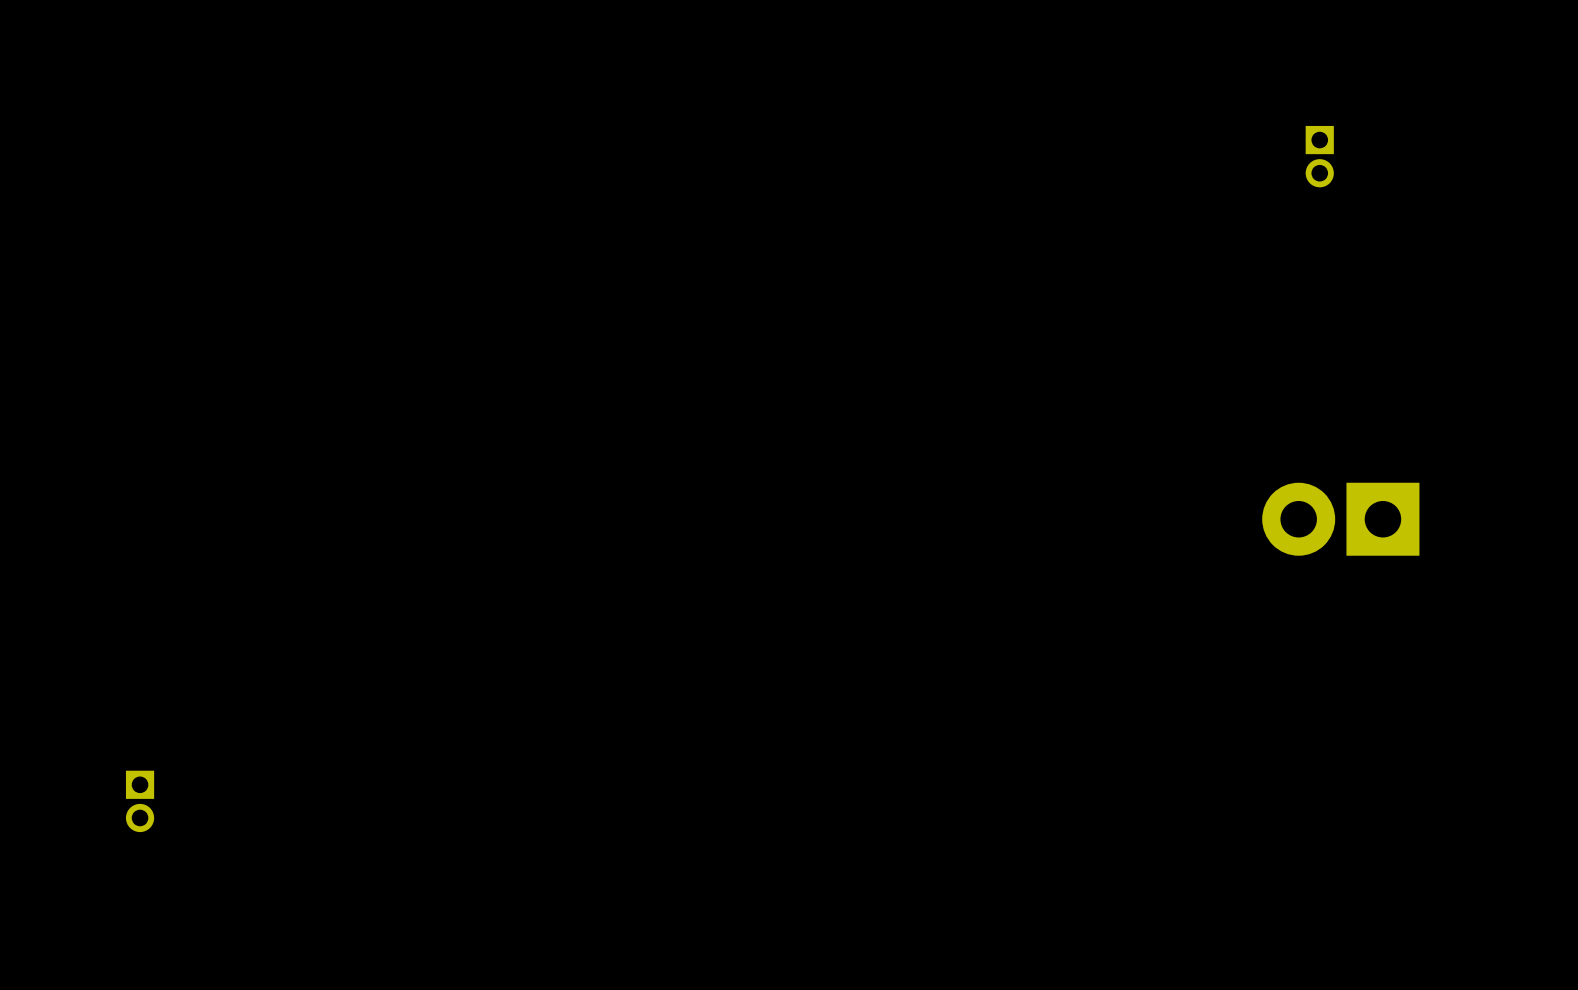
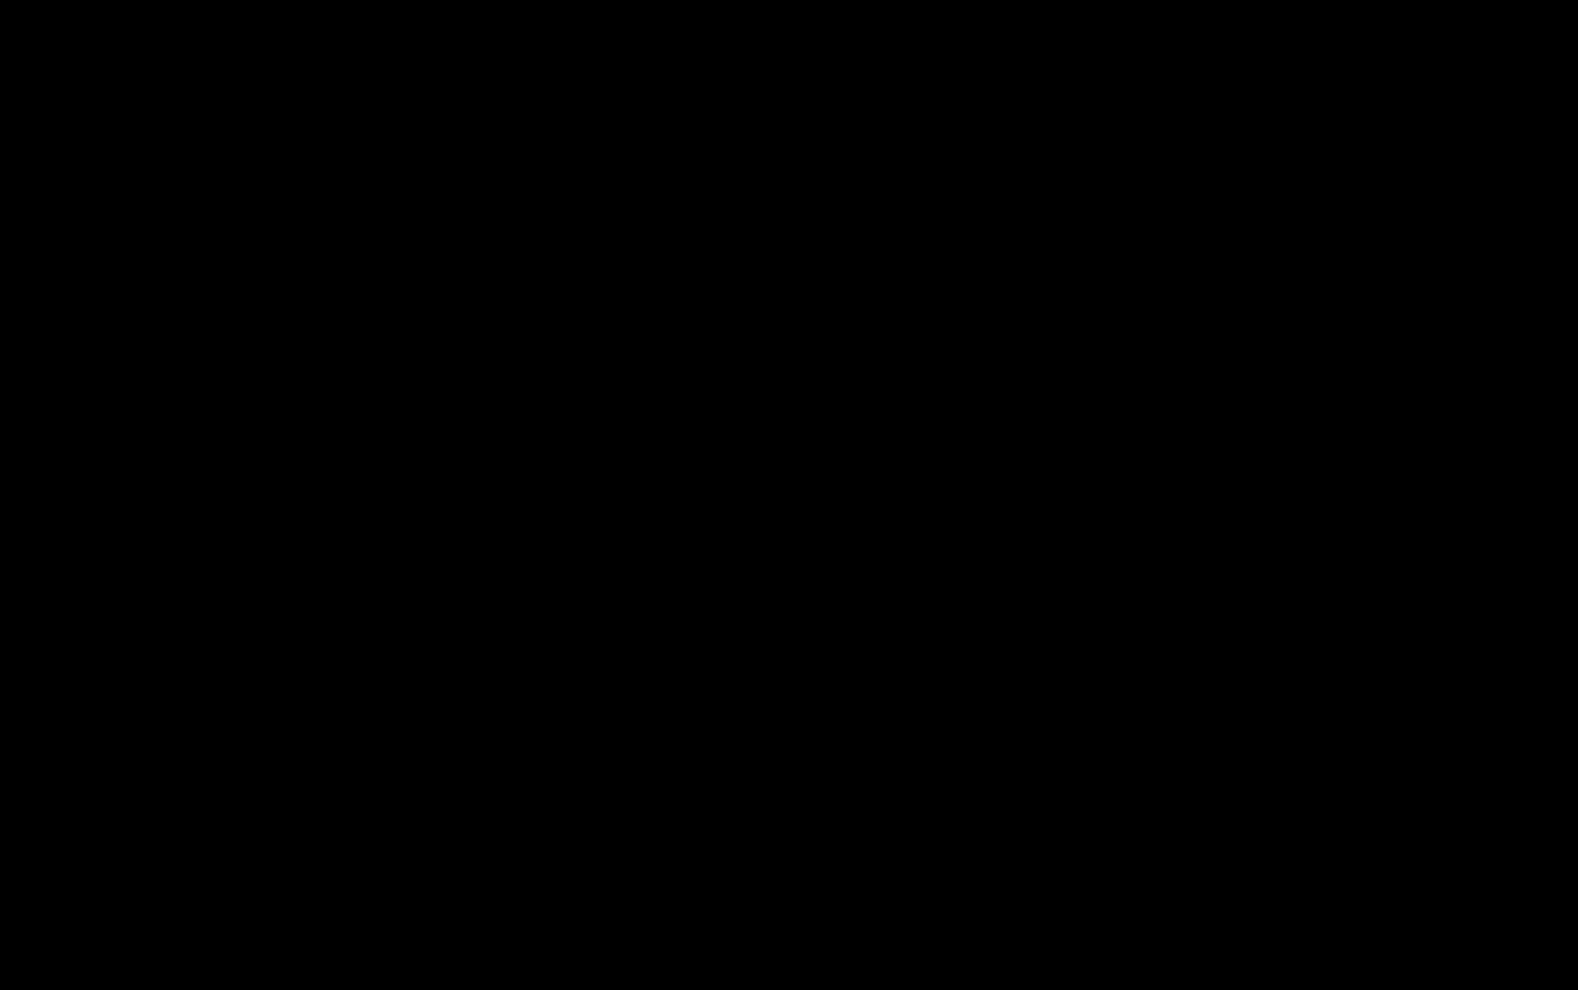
part: (1319, 156) -> none
part: (1340, 519) -> none
part: (140, 801) -> none

